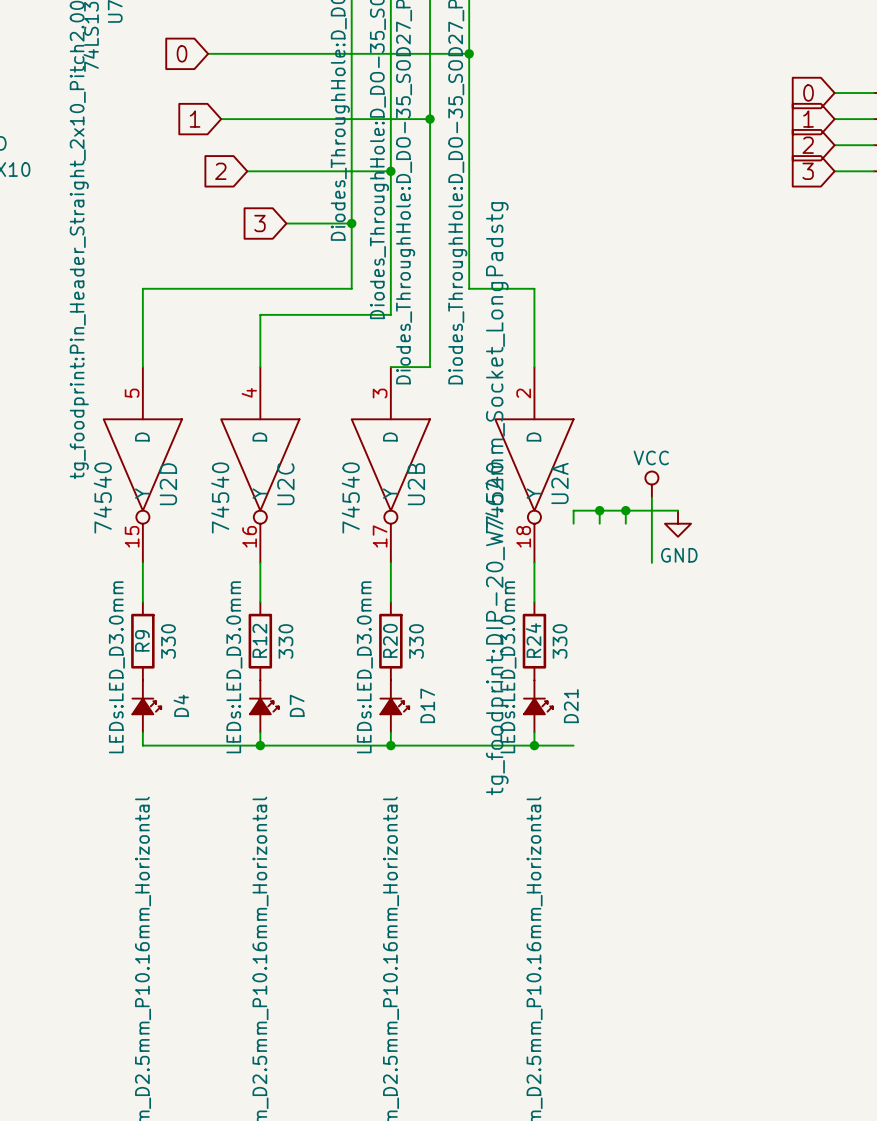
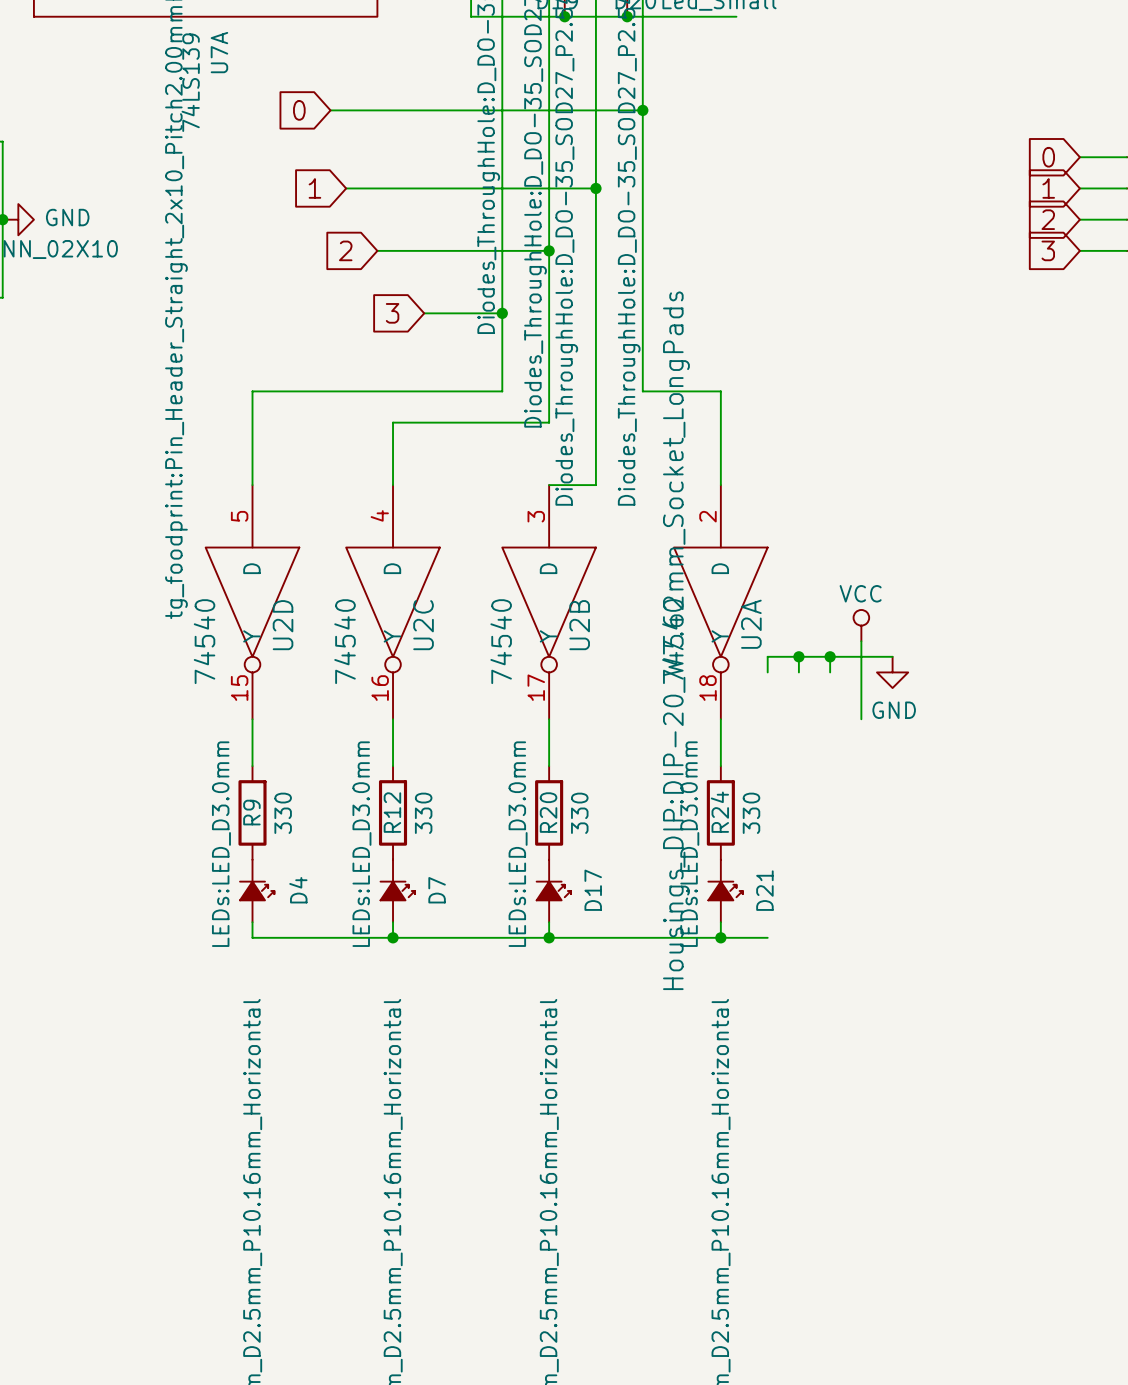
U2A text: tg_foodprint:DIP-20_W7.62mm_Socket_LongPadstg (497, 498) -> Housings_DIP:DIP-20_W7.62mm_Socket_LongPads (676, 640)

